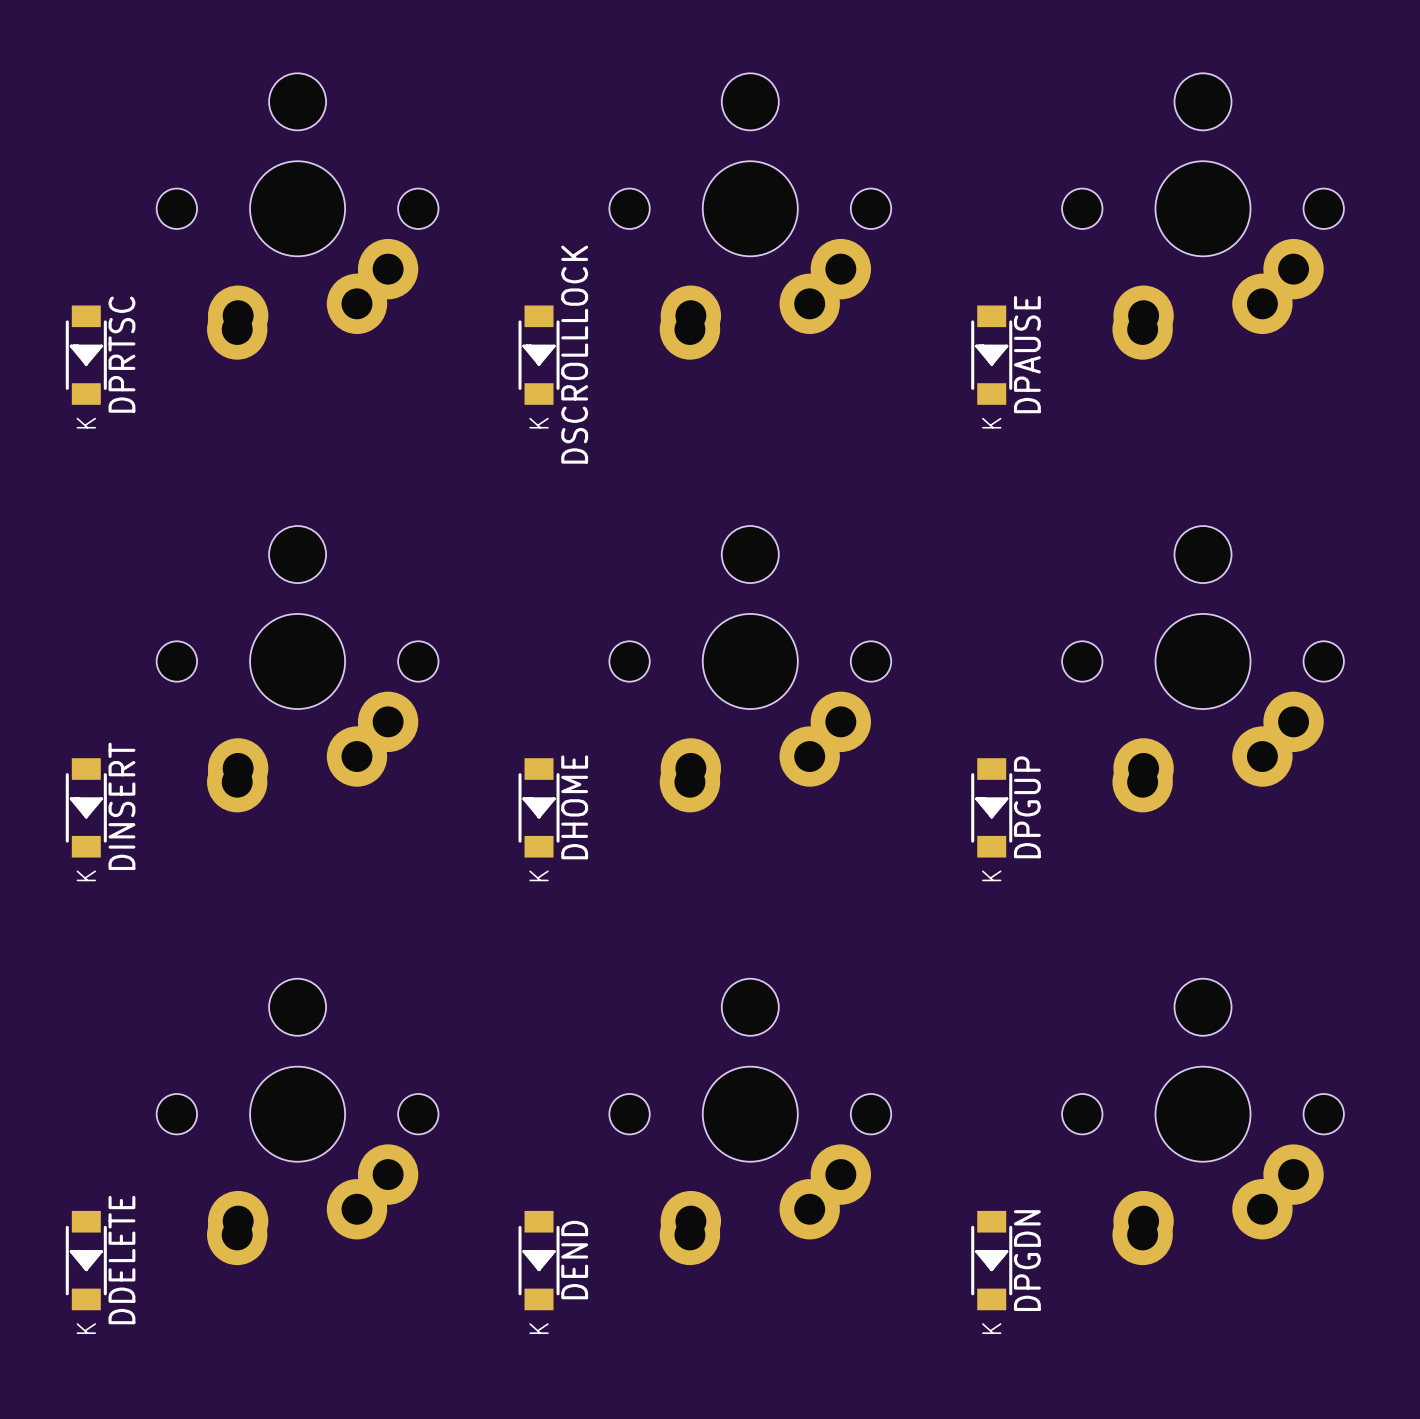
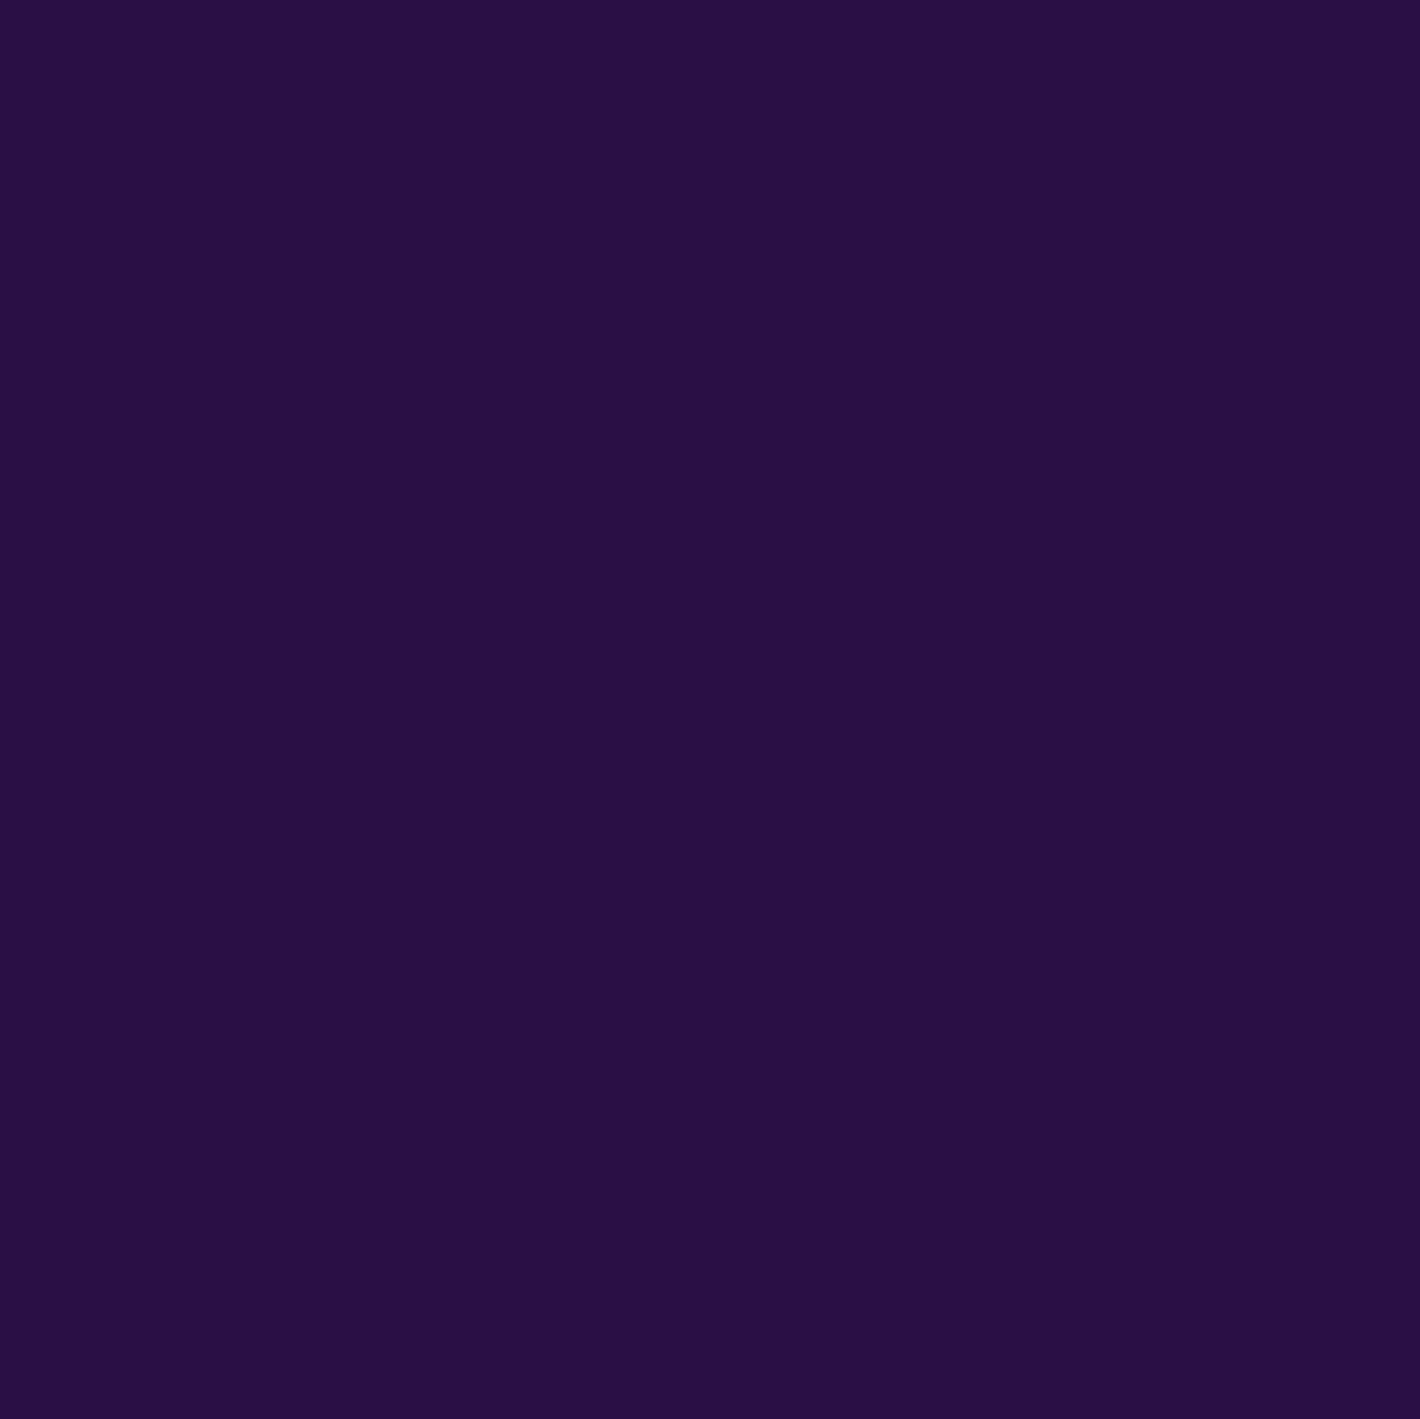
part: (297, 216) -> none
part: (750, 216) -> none
part: (1203, 216) -> none
DPRTSC: (86, 355) -> none
DSCROLLLOCK: (539, 355) -> none
DPAUSE: (991, 355) -> none
part: (297, 669) -> none
part: (750, 669) -> none
part: (1203, 669) -> none
DINSERT: (86, 807) -> none
DHOME: (539, 807) -> none
DPGUP: (991, 807) -> none
part: (297, 1121) -> none
part: (750, 1121) -> none
part: (1203, 1121) -> none
DDELETE: (86, 1260) -> none
DEND: (539, 1260) -> none
DPGDN: (991, 1260) -> none

